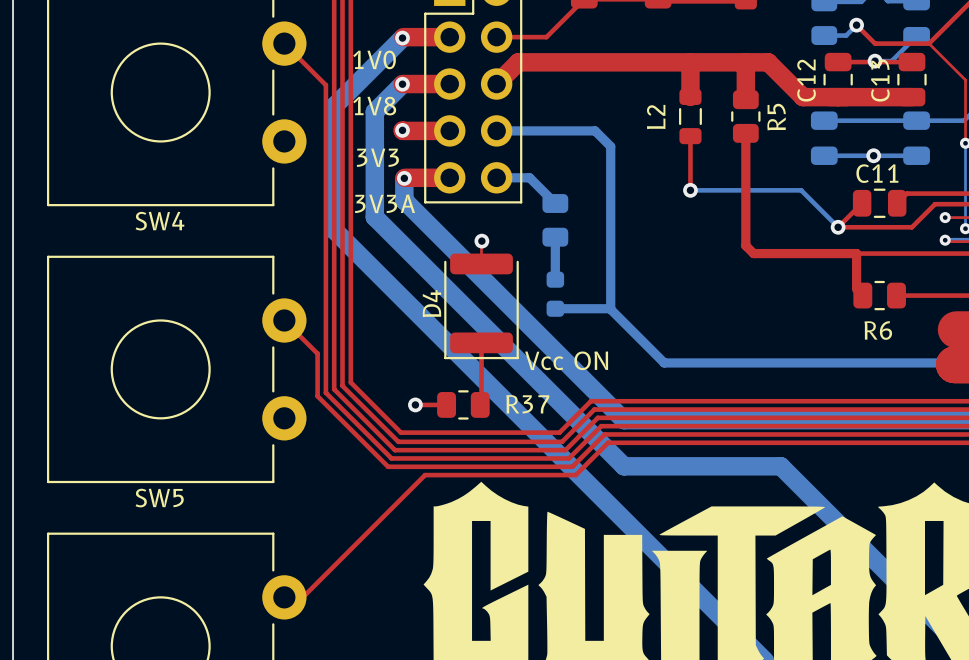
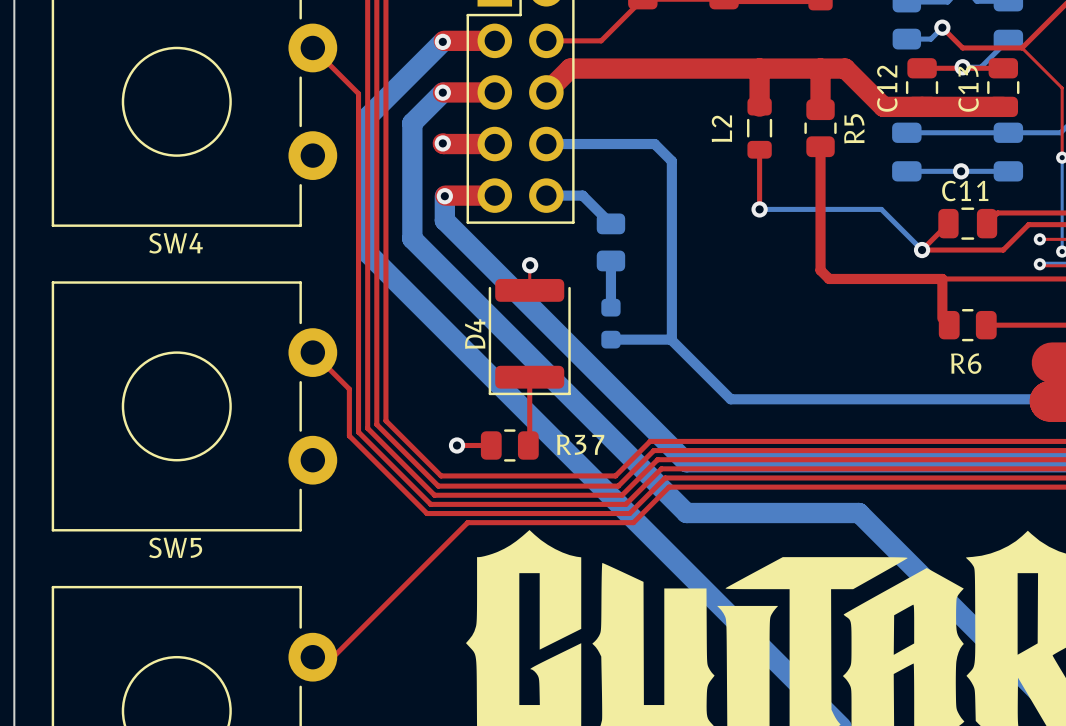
text: 1V0 (374, 59) -> none
text: 1V8 (374, 106) -> none
text: 3V3 (377, 157) -> none
text: 3V3A (385, 203) -> none
text: Vcc ON (566, 360) -> none

